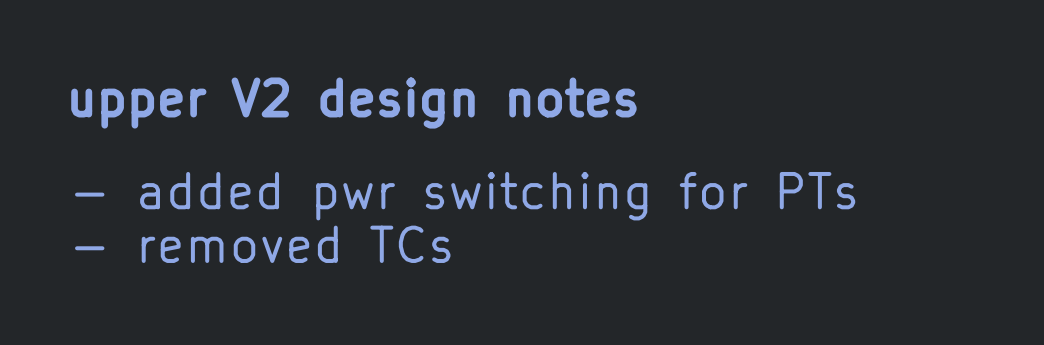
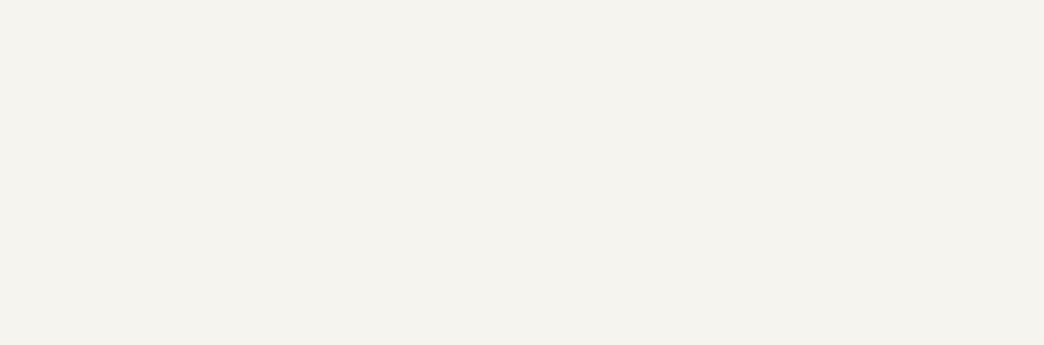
text: upper V2 design notes (353, 103) -> none
text: - added pwr switching for PTs (465, 196) -> none
text: - removed TCs (262, 244) -> none

